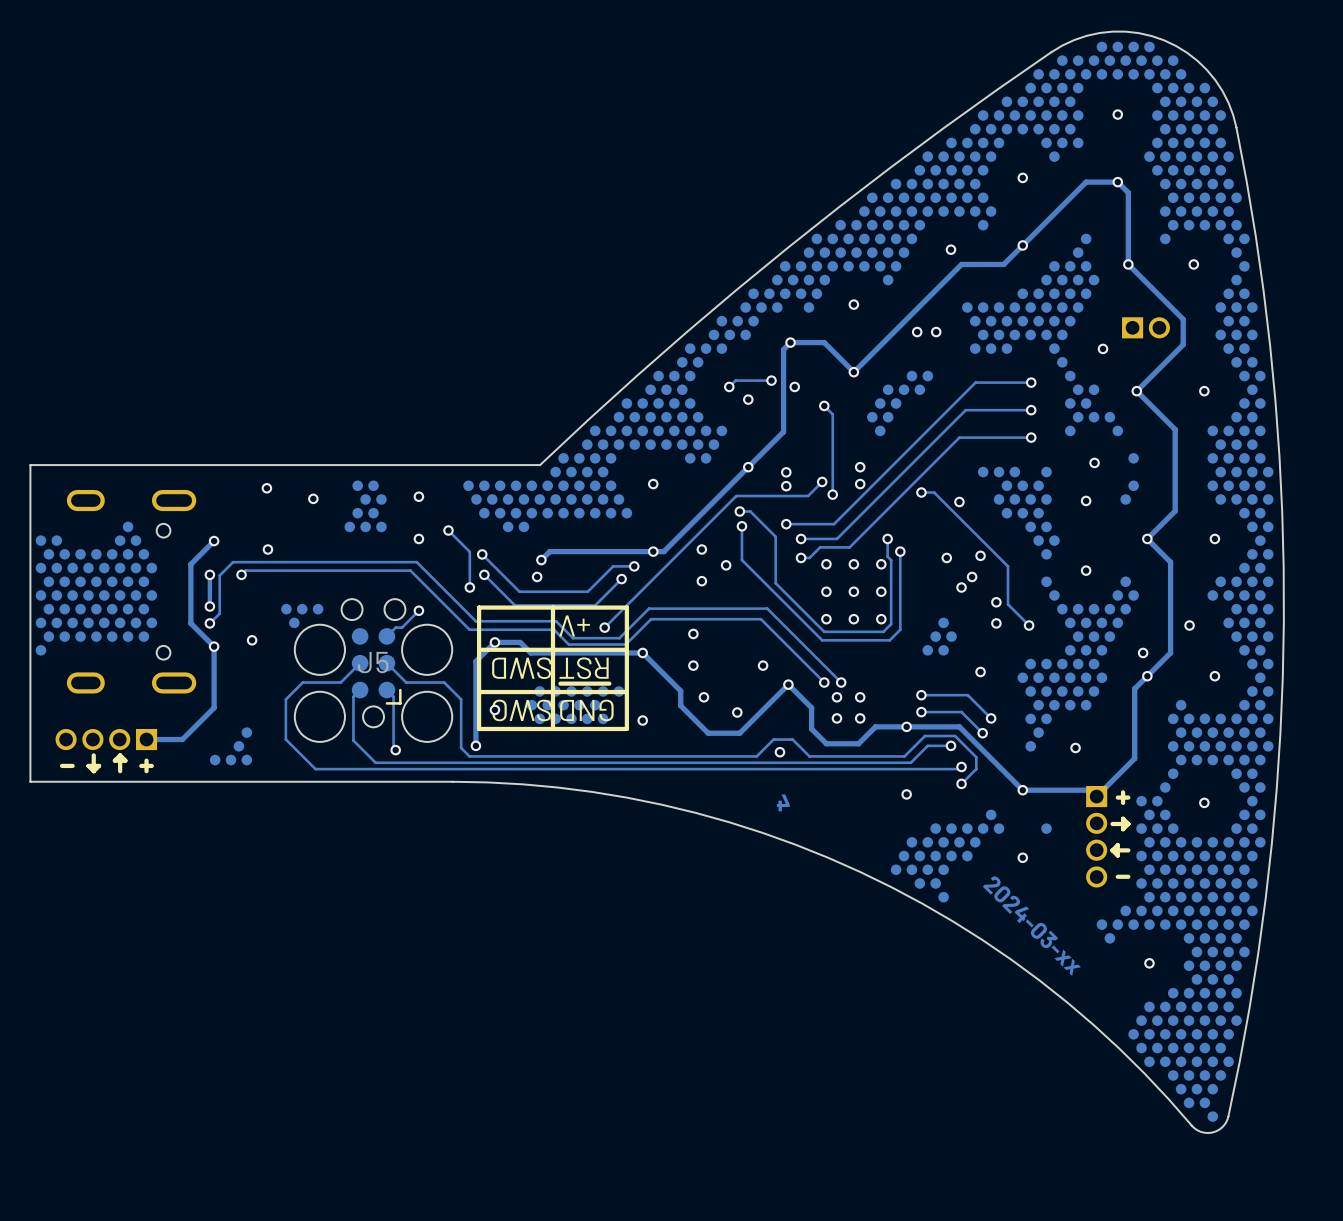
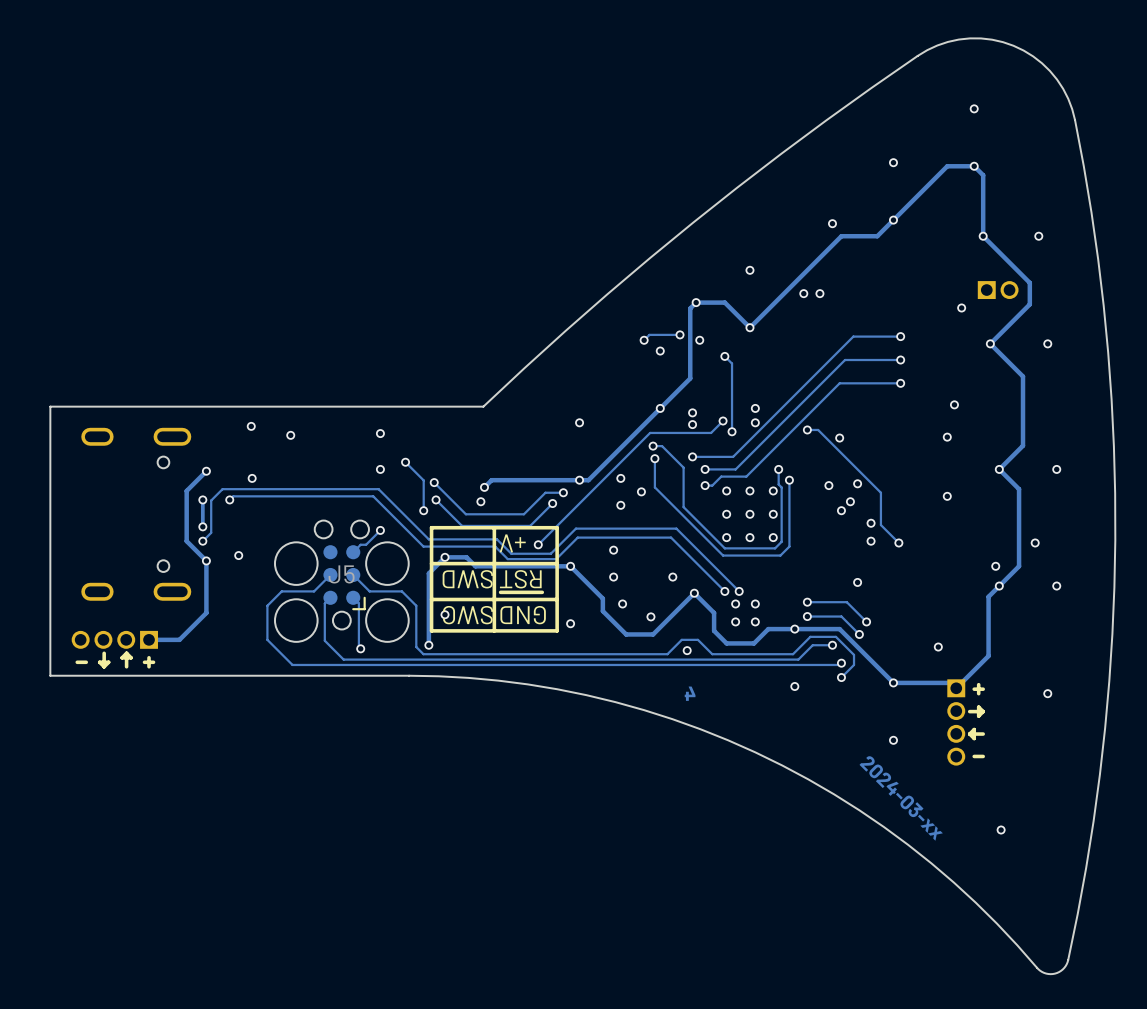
drawing: [463, 41, 1274, 1122] -> none
drawing: [962, 233, 1139, 505] -> none
drawing: [867, 370, 934, 437] -> none
drawing: [977, 466, 1139, 752] -> none
drawing: [344, 480, 387, 533] -> none
drawing: [35, 521, 158, 656] -> none
drawing: [281, 603, 324, 629] -> none
drawing: [922, 617, 957, 656] -> none
drawing: [526, 686, 625, 725] -> none
drawing: [209, 727, 253, 766] -> none
drawing: [890, 809, 1005, 903] -> none
drawing: [1041, 823, 1052, 834] -> none

